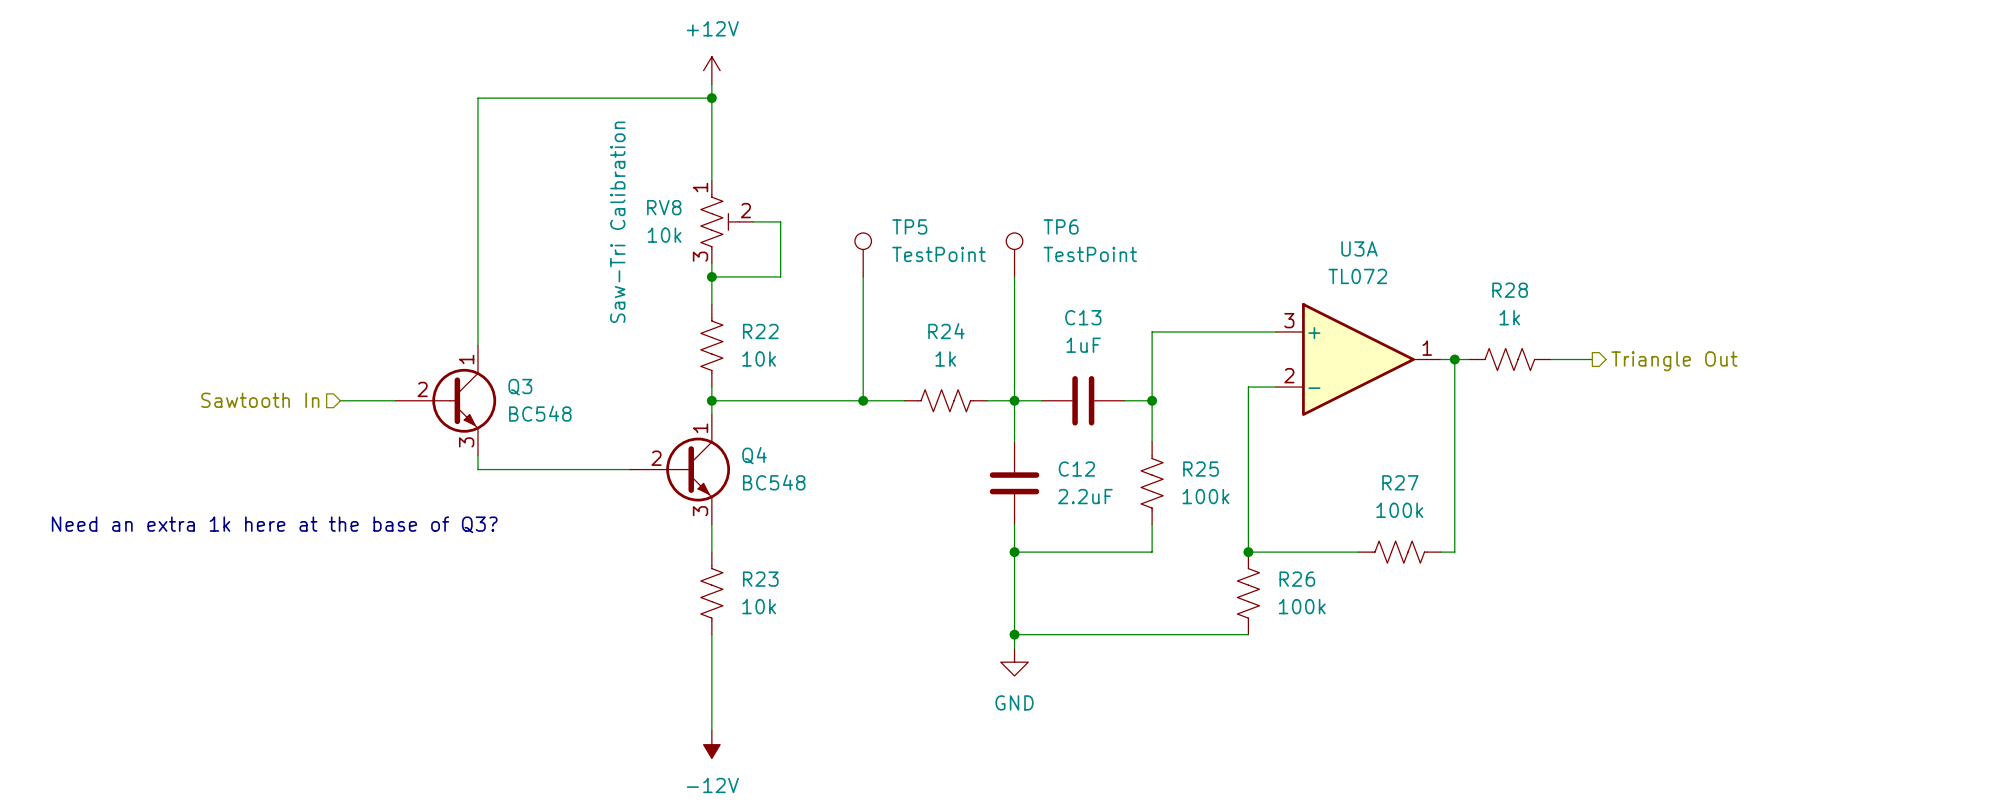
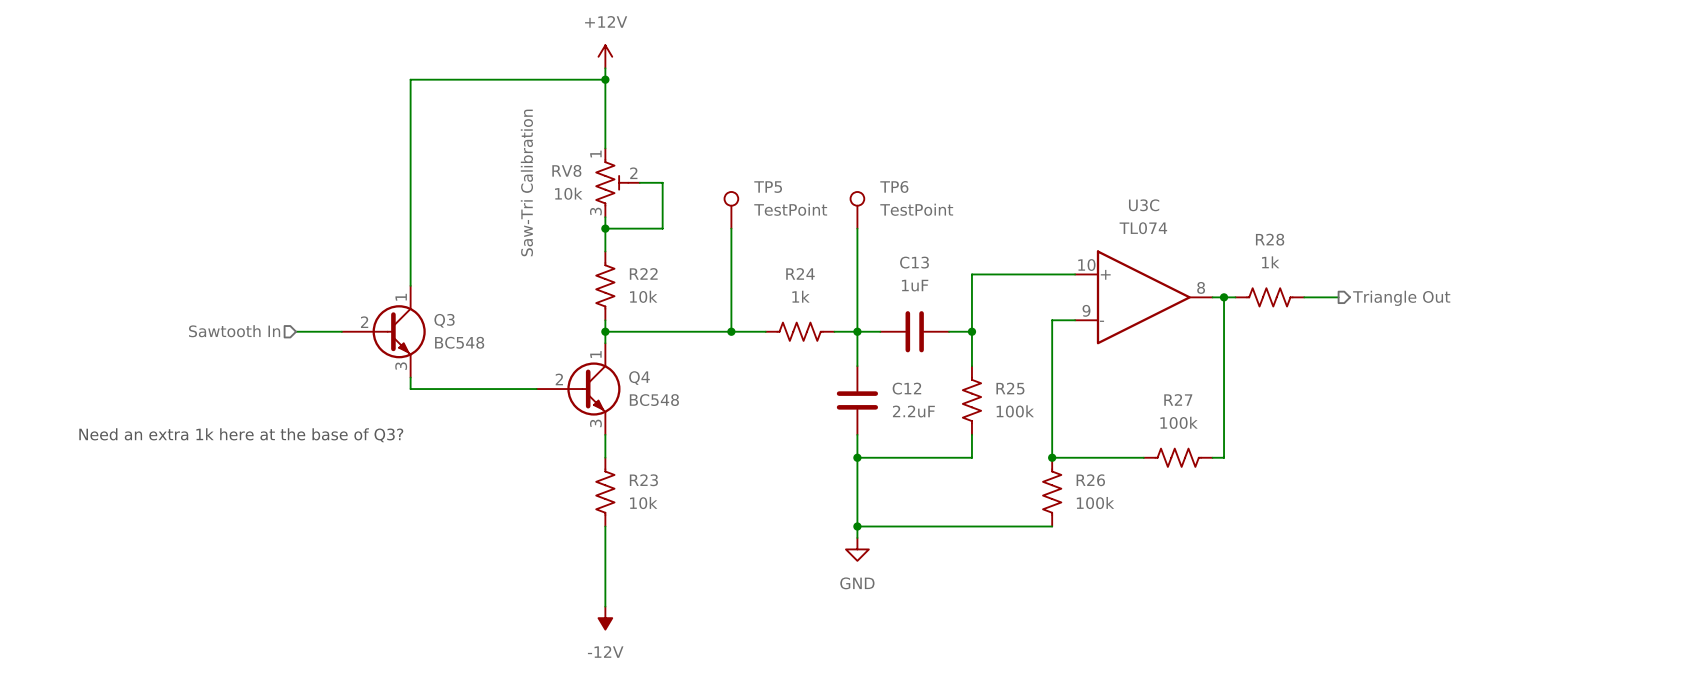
U3A name: U3A (1359, 248) -> U3C (1144, 205)
U3A value: TL072 (1357, 276) -> TL074 (1143, 228)
U3A pin number: 3 (1289, 320) -> 10 (1086, 265)
U3A pin number: 1 (1427, 348) -> 8 (1201, 287)
U3A pin number: 2 (1289, 375) -> 9 (1086, 310)

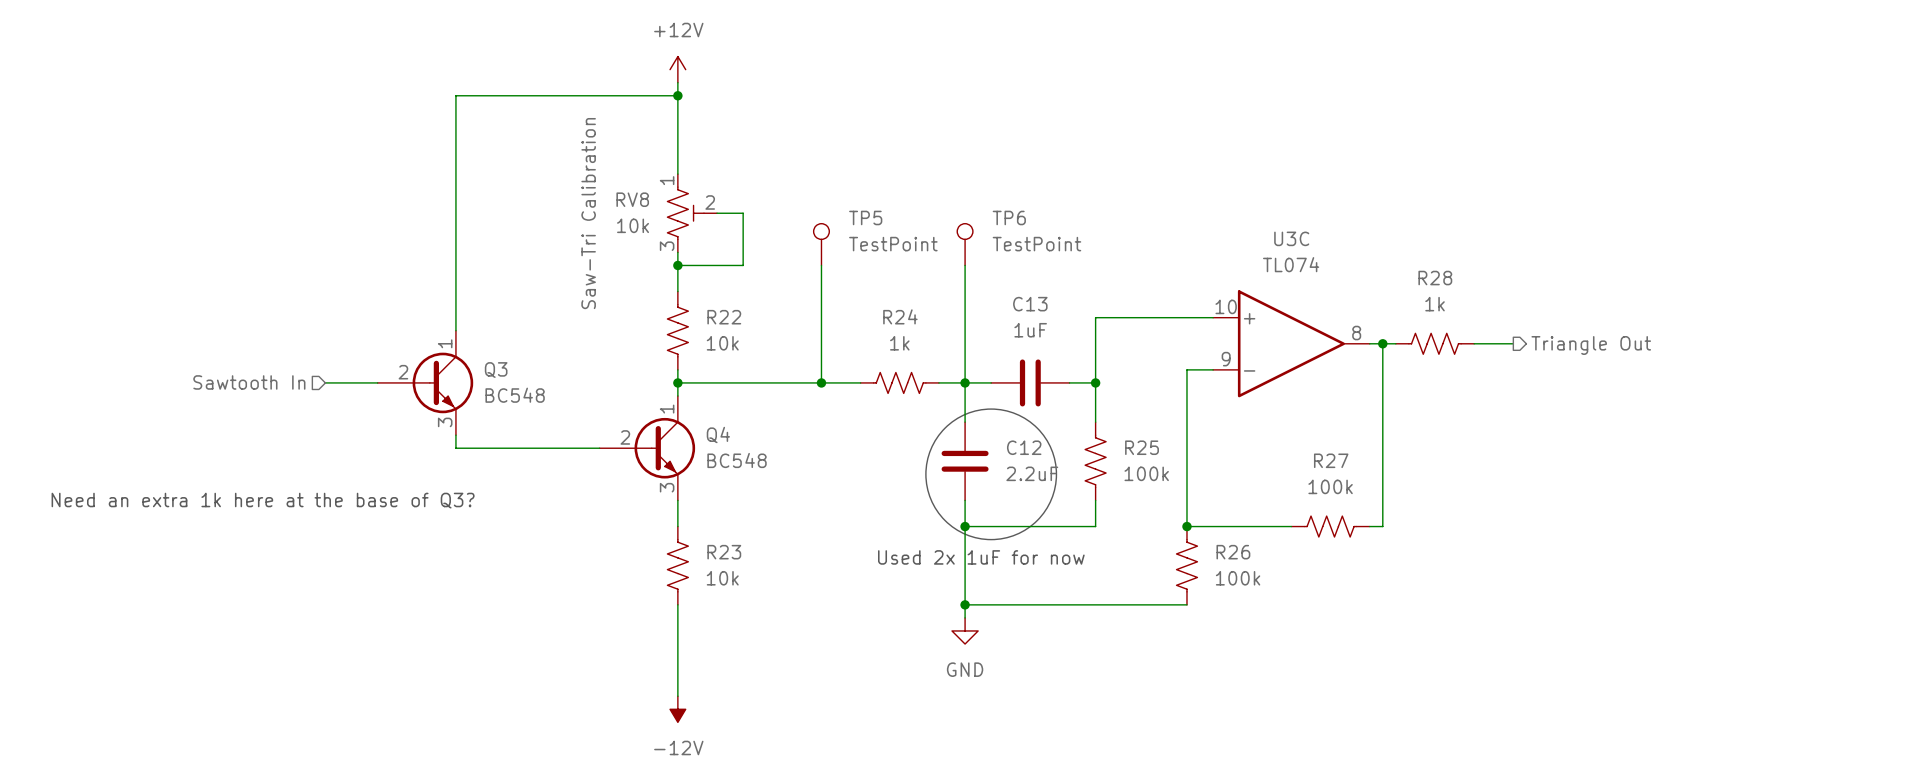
drawing: none -> [925, 409, 1057, 540]
text: none -> Used 2x 1uF for now (981, 557)

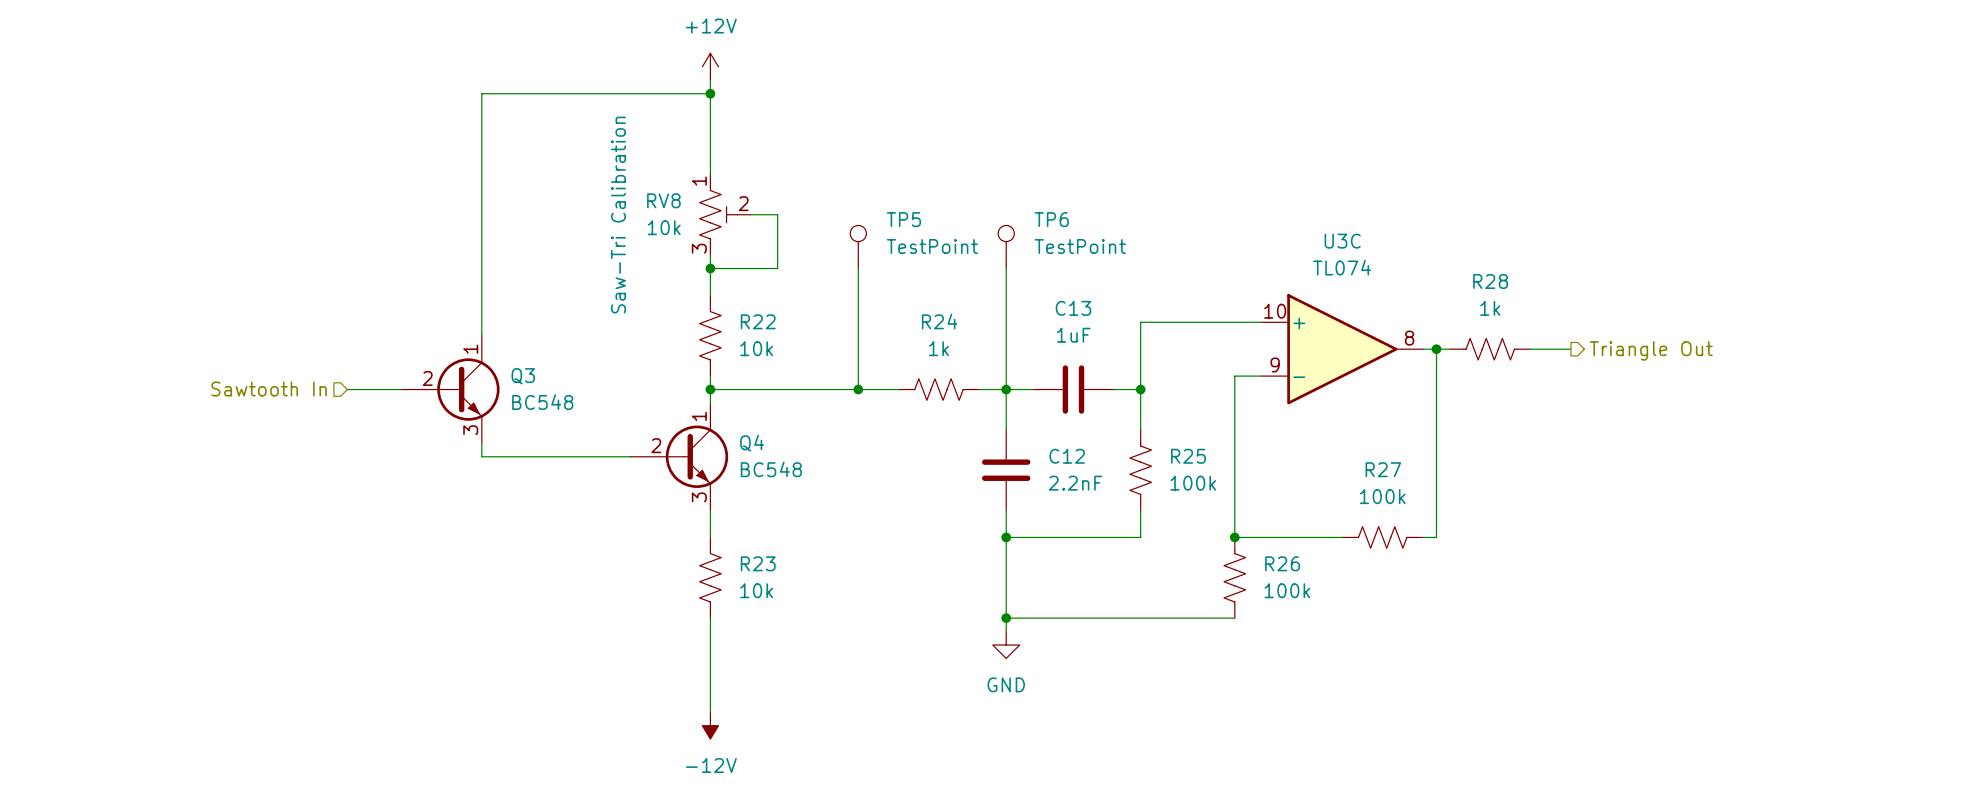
drawing: [925, 409, 1057, 540] -> none
C12 value: 2.2uF (1032, 473) -> 2.2nF (1075, 483)
text: Need an extra 1k here at the base of Q3? (263, 500) -> none
text: Used 2x 1uF for now (981, 557) -> none

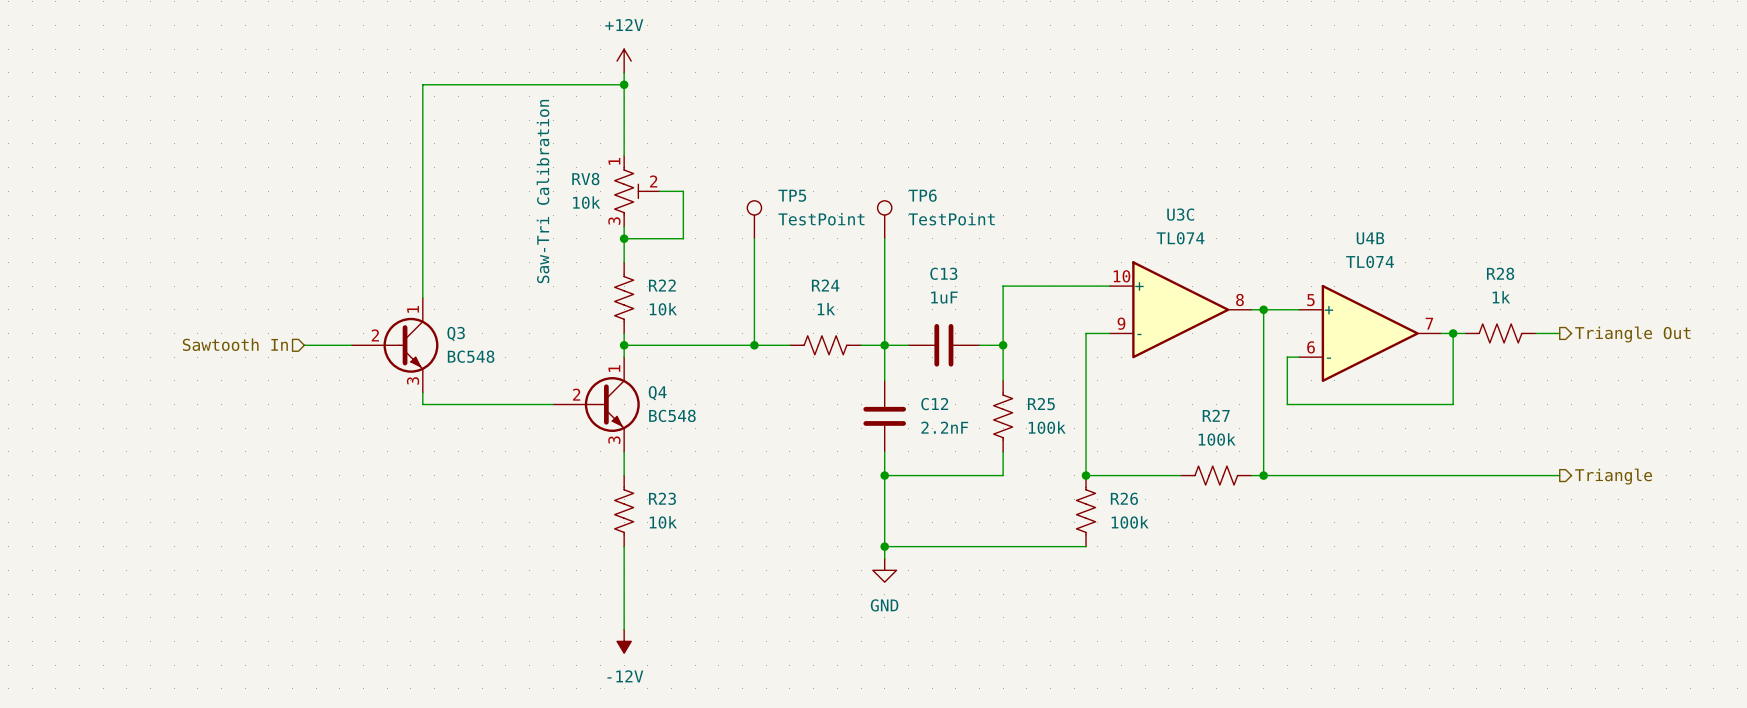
R28 position: (1490, 349) -> (1500, 333)
hierarchical label position: Triangle Out (1651, 350) -> Triangle Out (1632, 334)
U4B: none -> TL074 (1370, 333)
wire: none -> (1441, 333) (1464, 333)
wire: none -> (1453, 333) (1453, 404) (1287, 404) (1287, 357) (1299, 357)
junction: none -> (1453, 333)
wire: none -> (1536, 333) (1559, 333)
wire: none -> (1263, 475) (1559, 475)
junction: none -> (1263, 475)
hierarchical label: none -> Triangle (1613, 476)

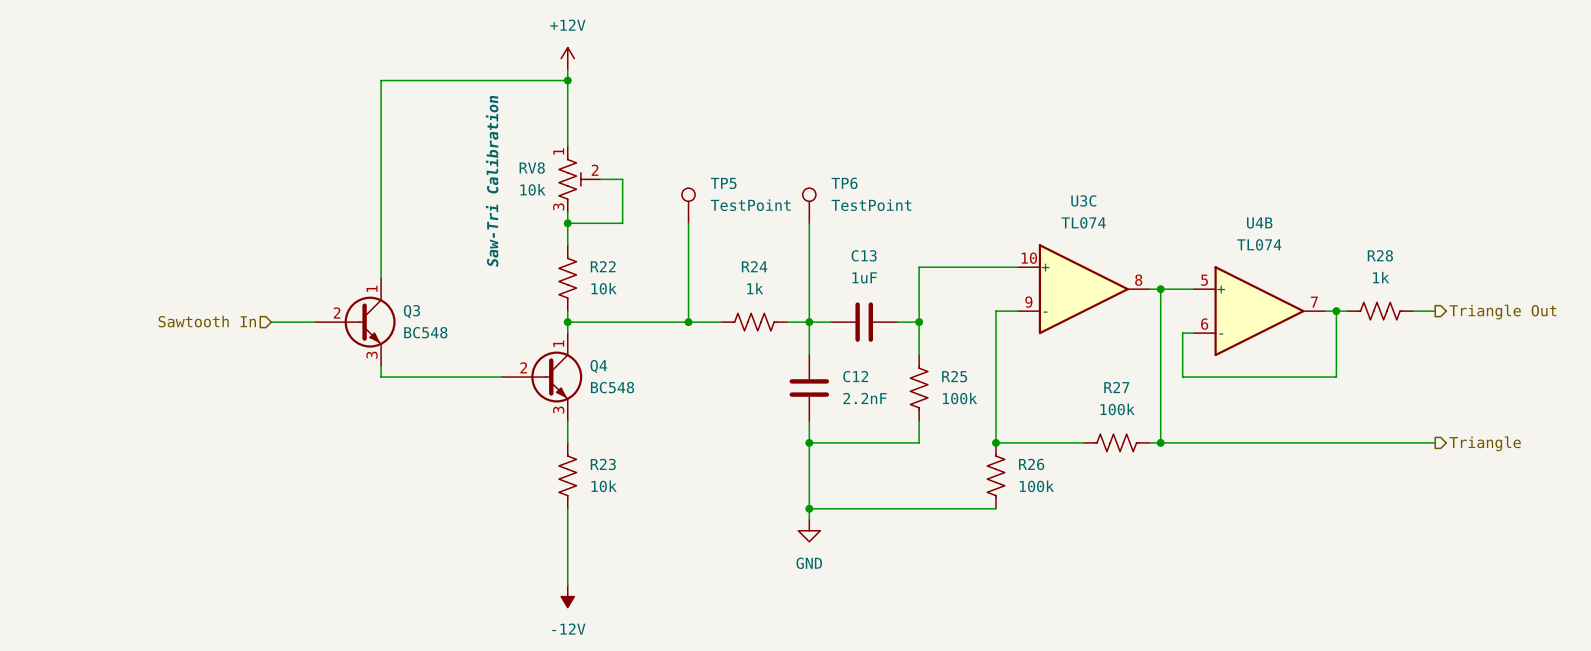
RV8 text: Saw-Tri Calibration (542, 191) -> none
RV8 text: none -> Saw-Tri Calibration (492, 181)

